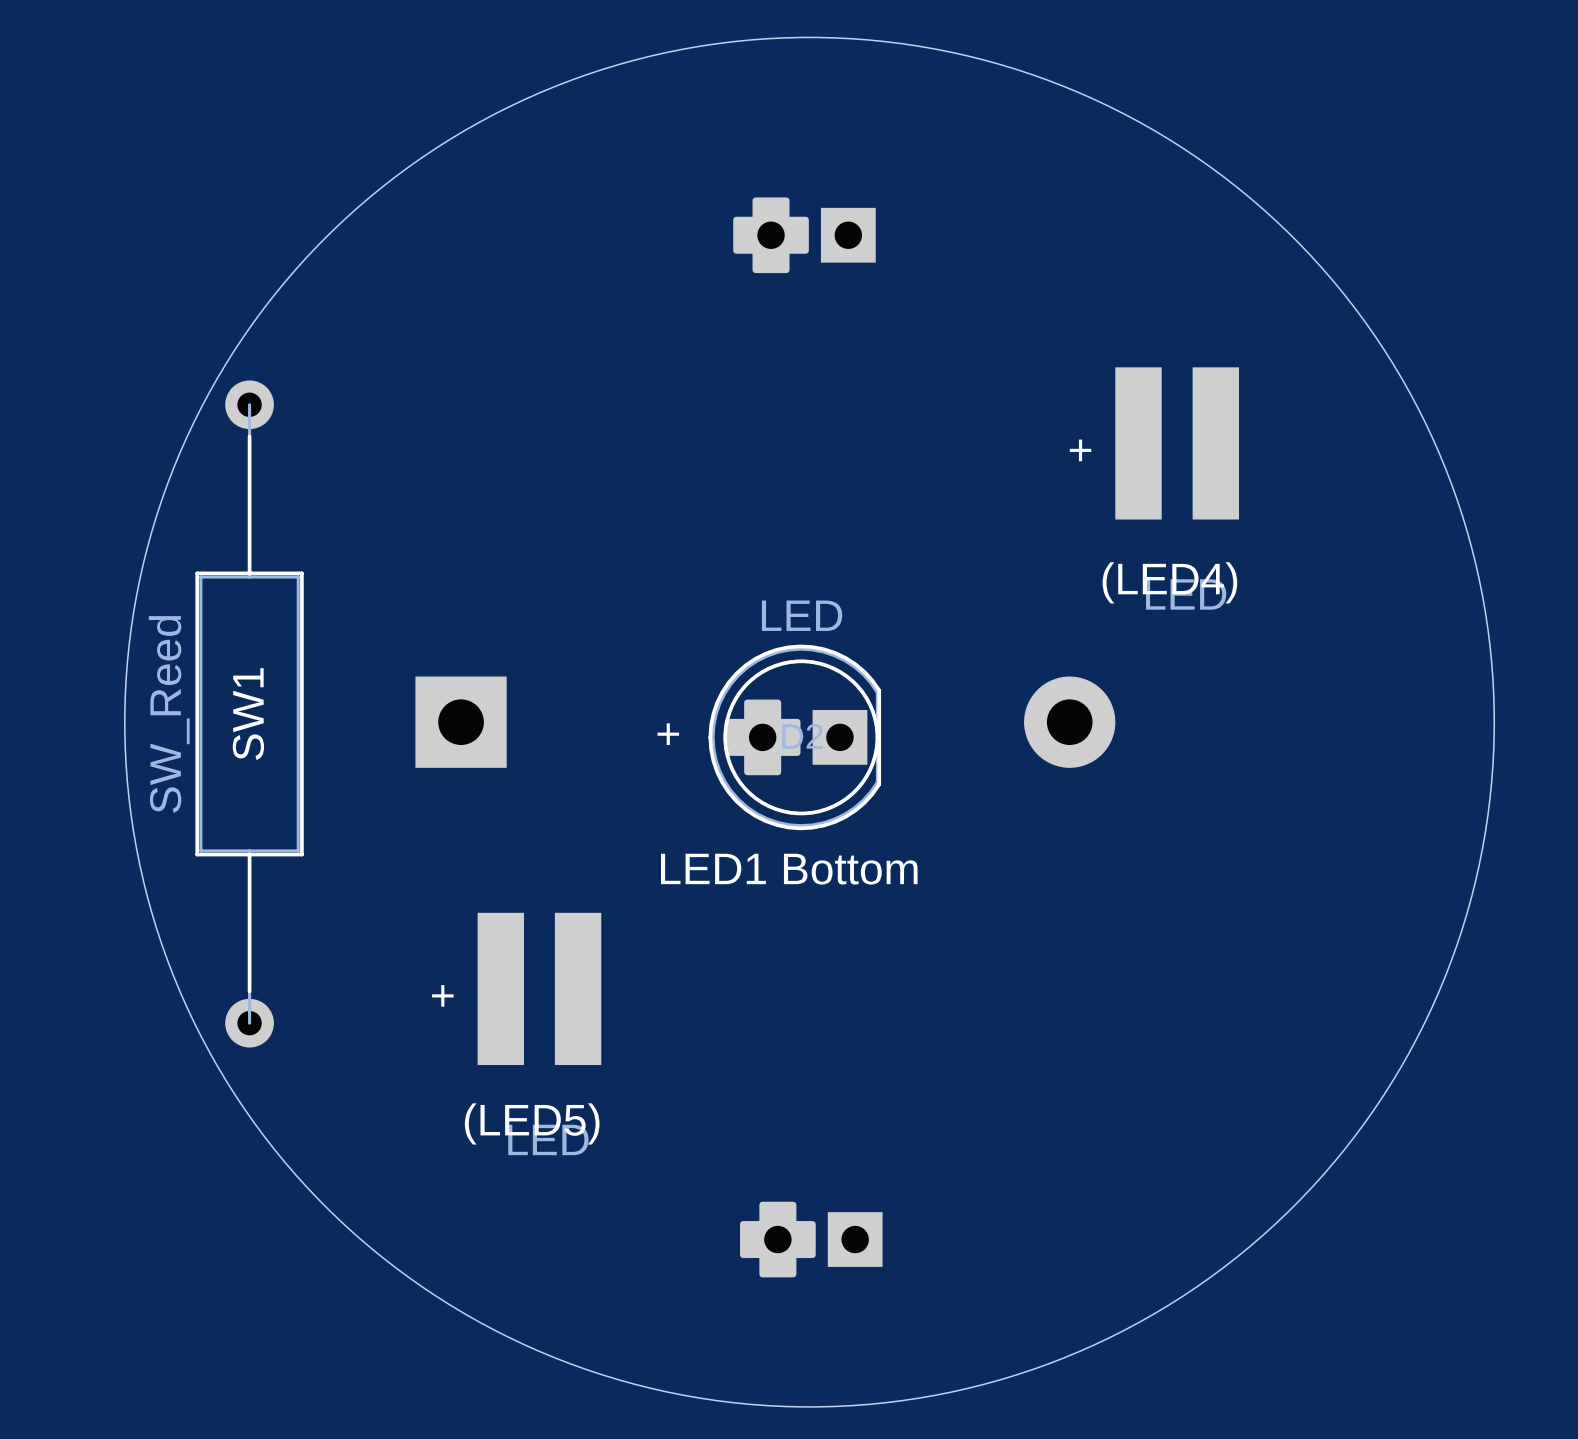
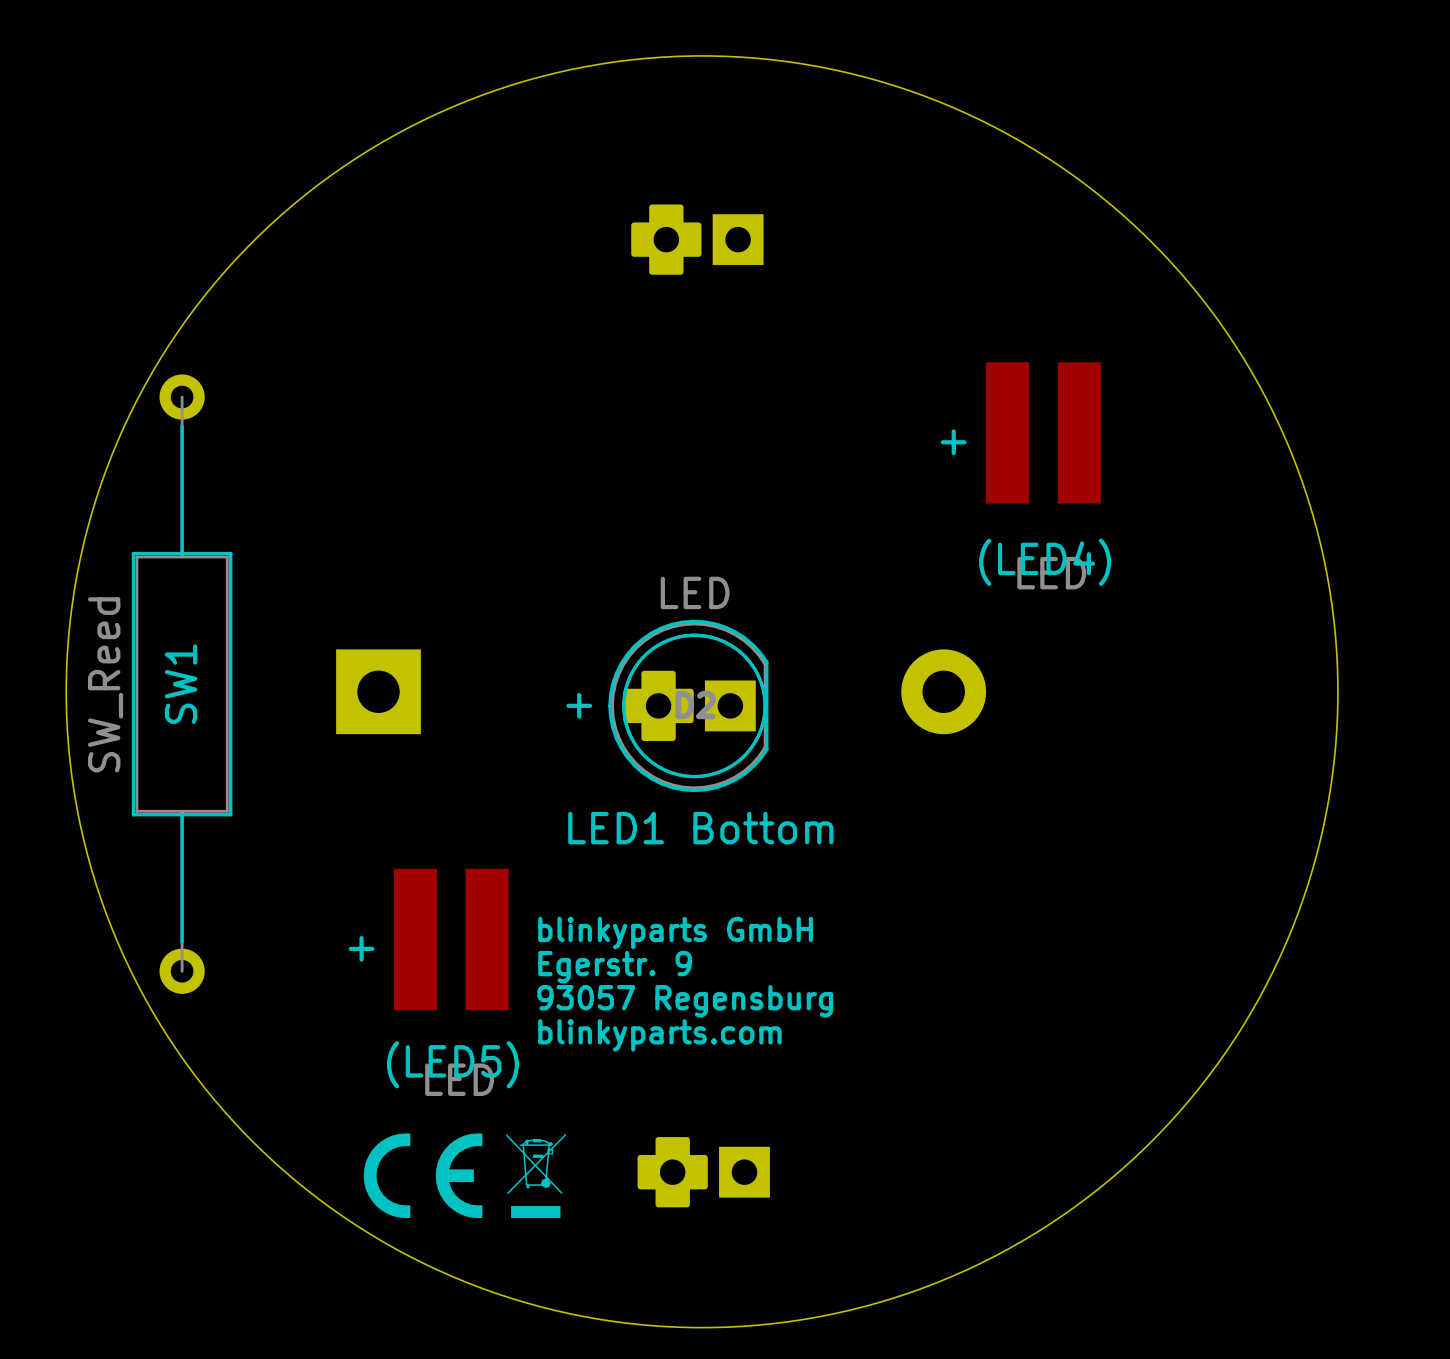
text: none -> blinkyparts GmbH (675, 933)
text: none -> Egerstr. 9 (615, 967)
text: none -> 93057 Regensburg (685, 1001)
text: none -> blinkyparts.com (659, 1035)
drawing: none -> [363, 1133, 566, 1219]

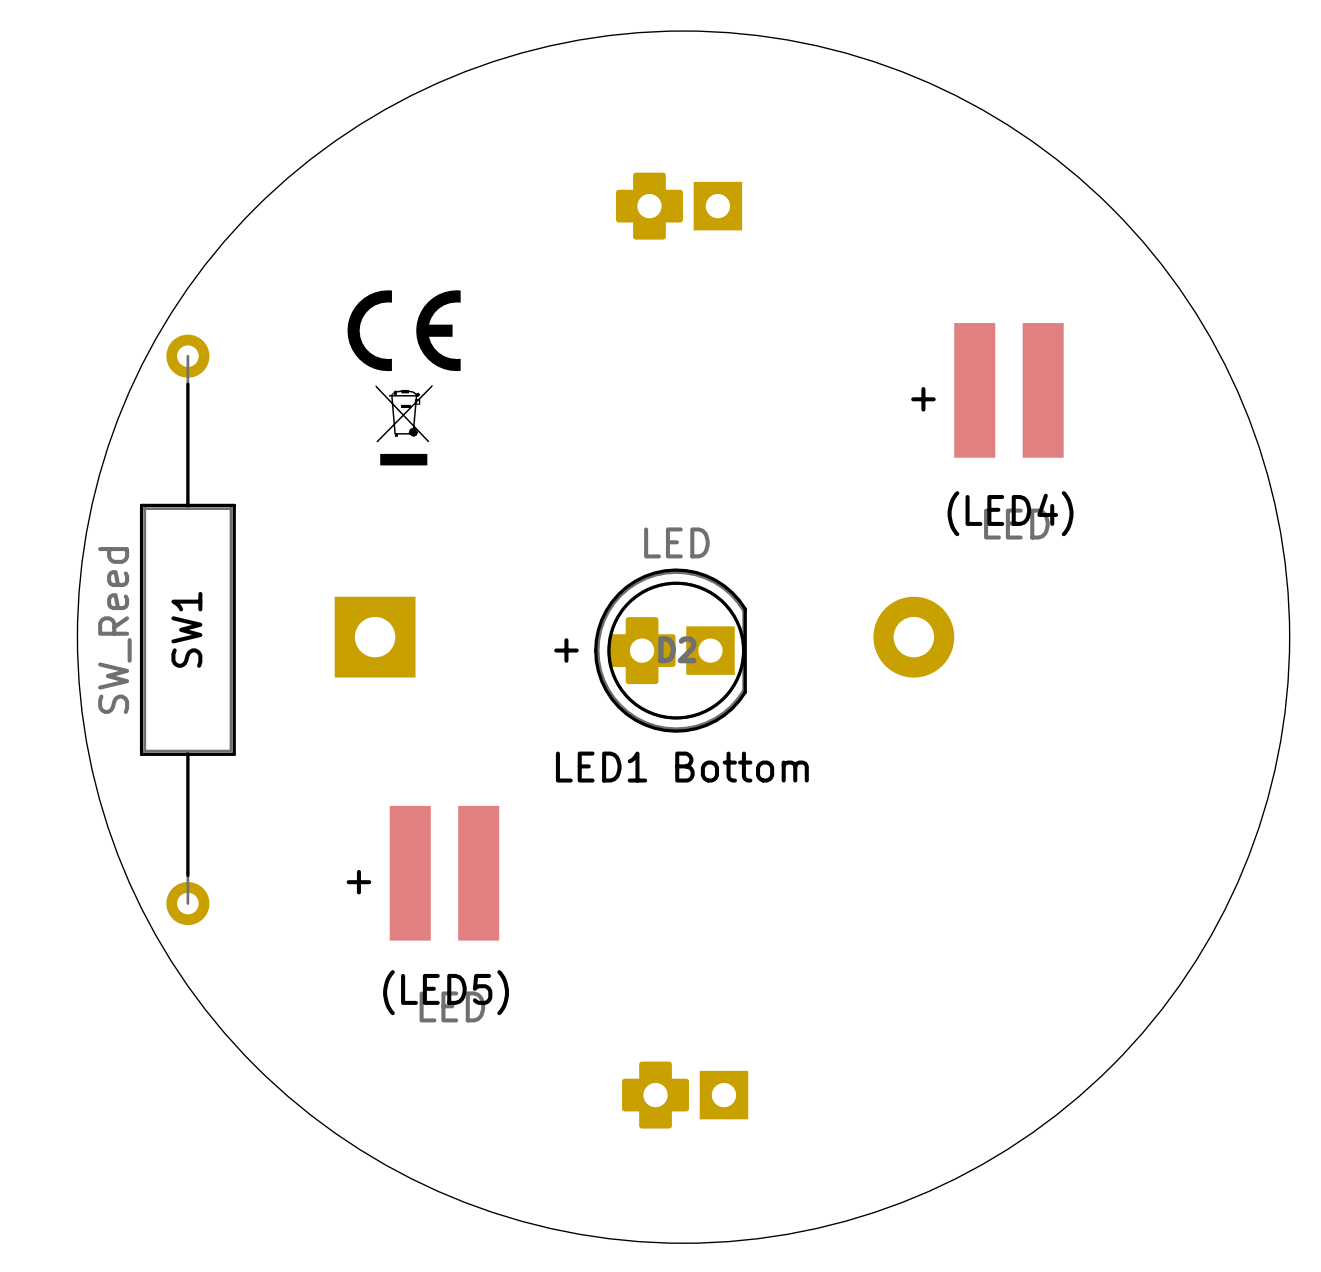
drawing: none -> [347, 290, 461, 466]
text: blinkyparts GmbH (675, 933) -> none
text: Egerstr. 9 (615, 967) -> none
text: 93057 Regensburg (685, 1001) -> none
text: blinkyparts.com (659, 1035) -> none
drawing: [363, 1133, 566, 1219] -> none

